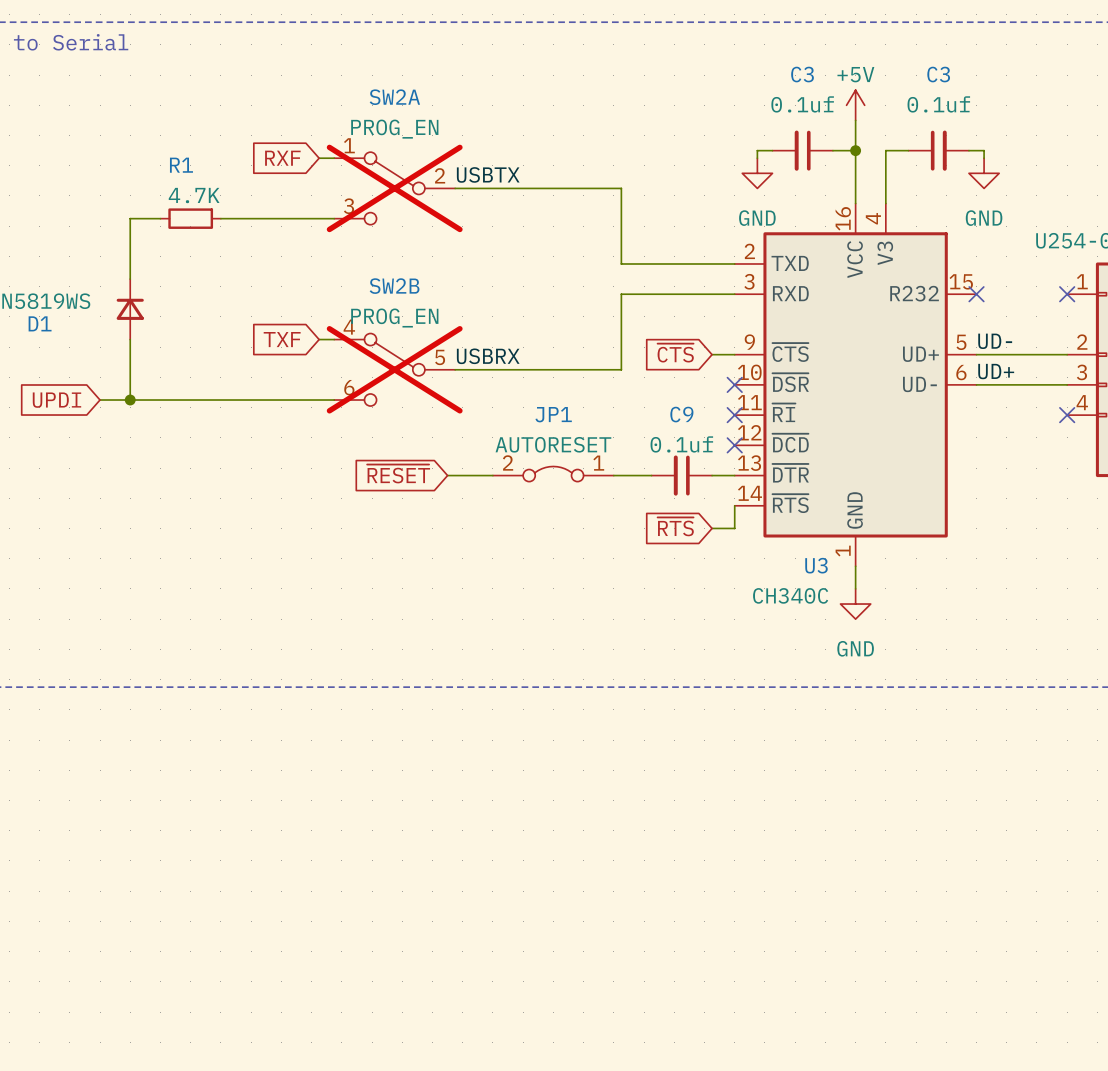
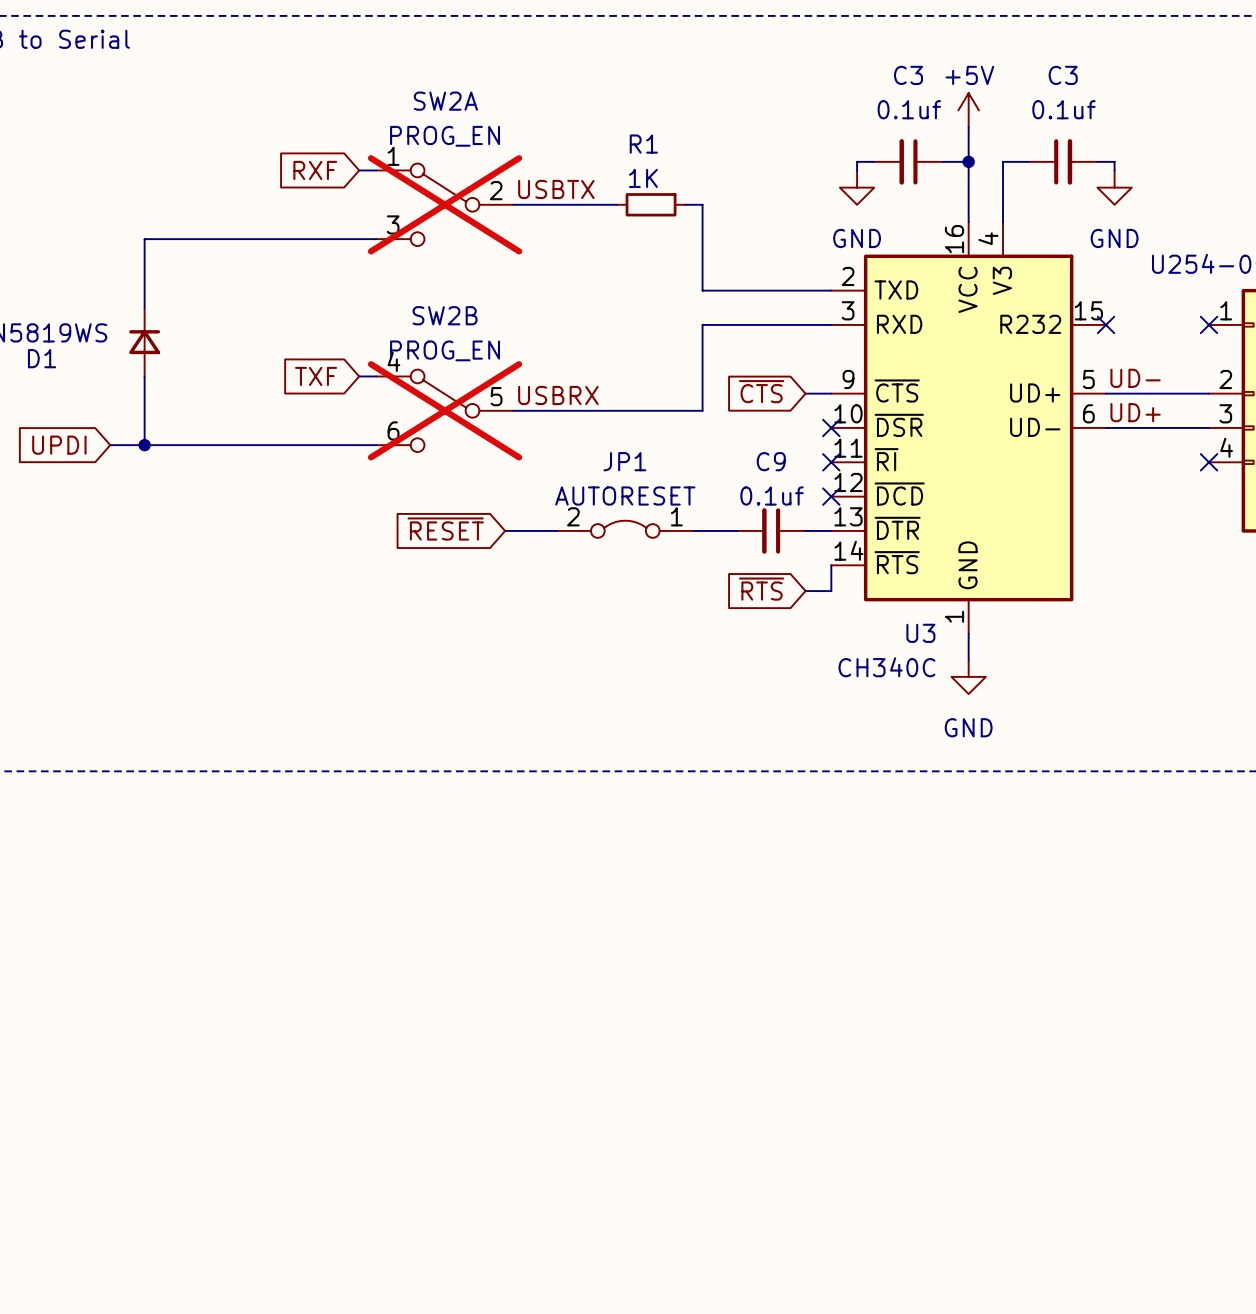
wire: (545, 188) (606, 188) -> none
R1 value: 4.7K (194, 195) -> 1K (643, 178)
wire: none -> (178, 239) (247, 239)
R1 position: (190, 218) -> (651, 204)

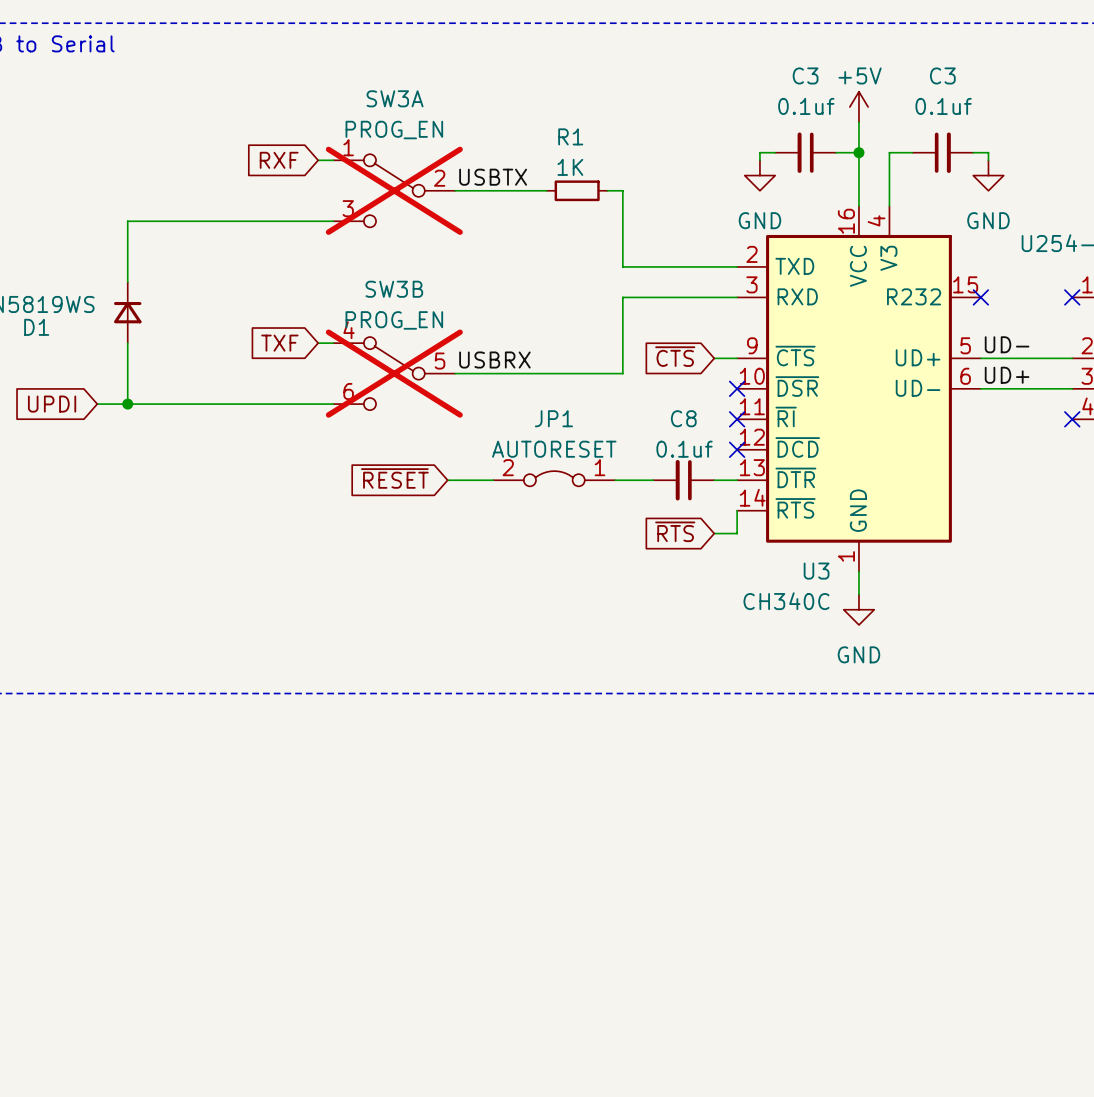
SW2A name: SW2A (445, 101) -> SW3A (395, 98)
SW2B name: SW2B (445, 315) -> SW3B (394, 289)
C9 name: C9 (771, 461) -> C8 (683, 418)

